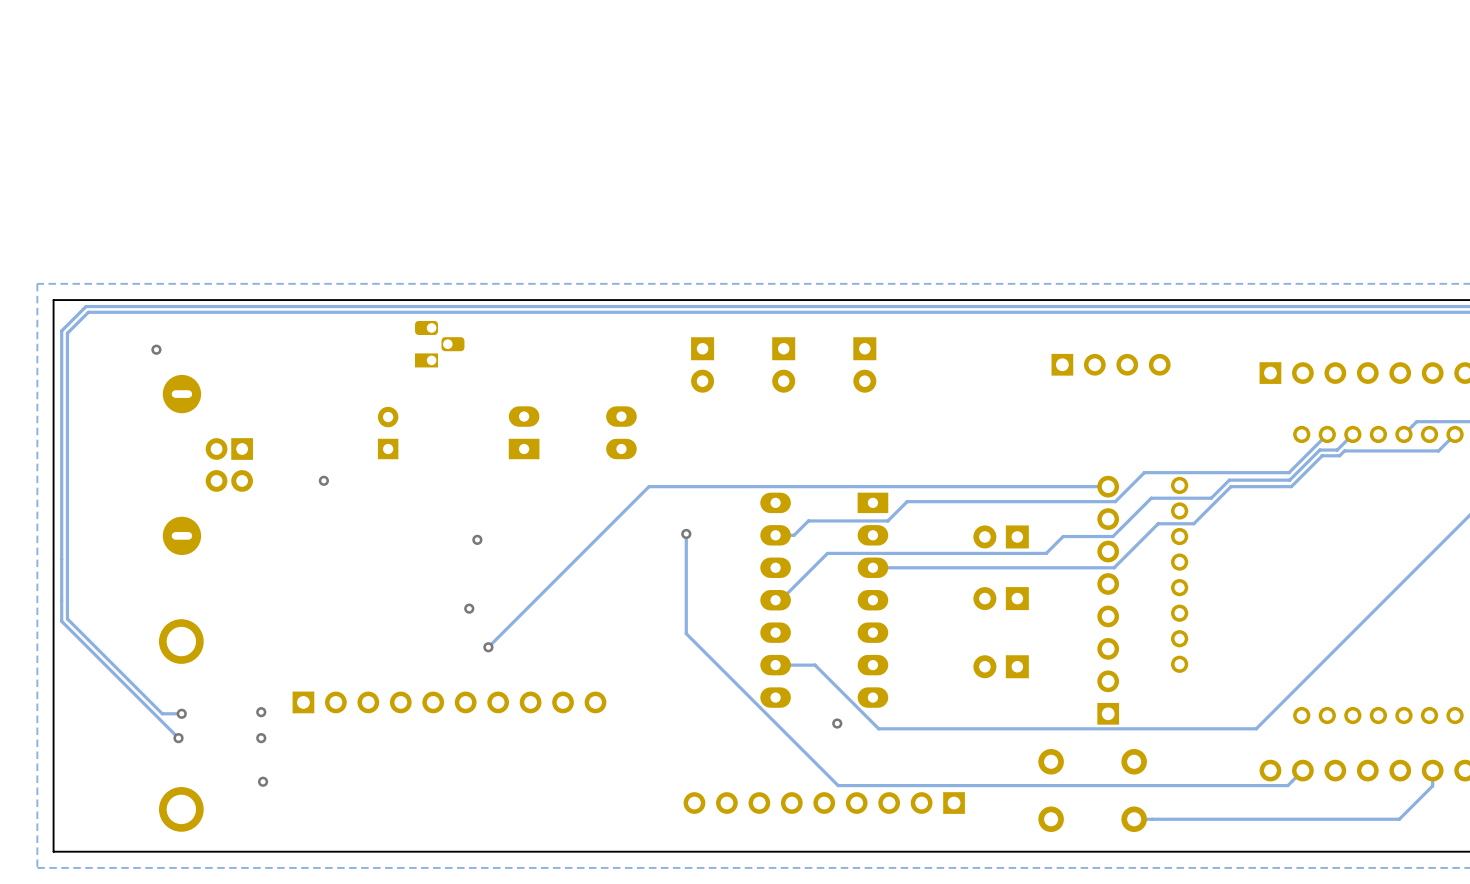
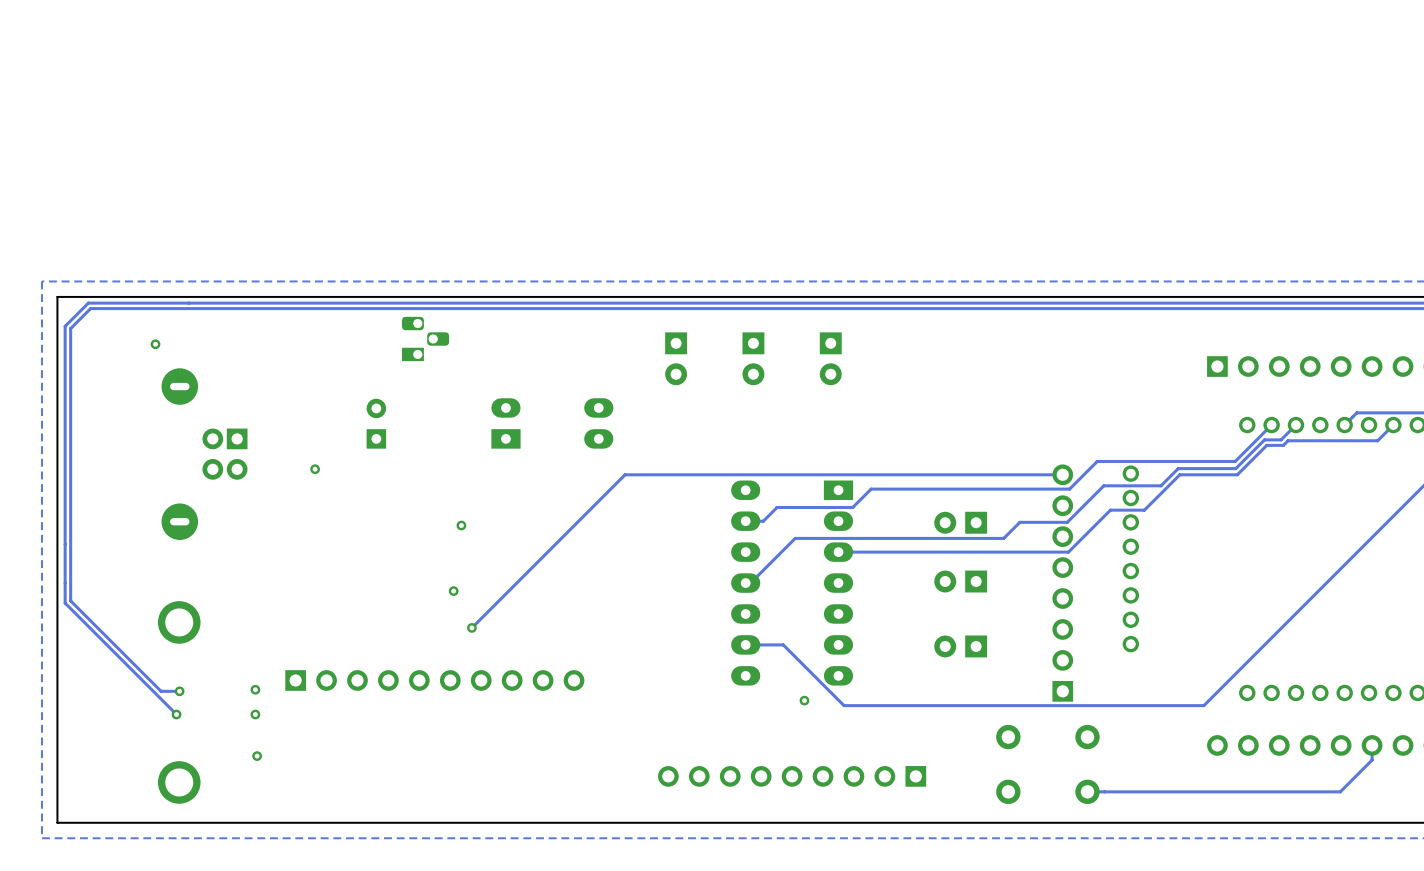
part: (1111, 364) -> none
track: (686, 533) (686, 633) (838, 785) (1287, 785) (1302, 770) -> none
via: (686, 533) -> none

